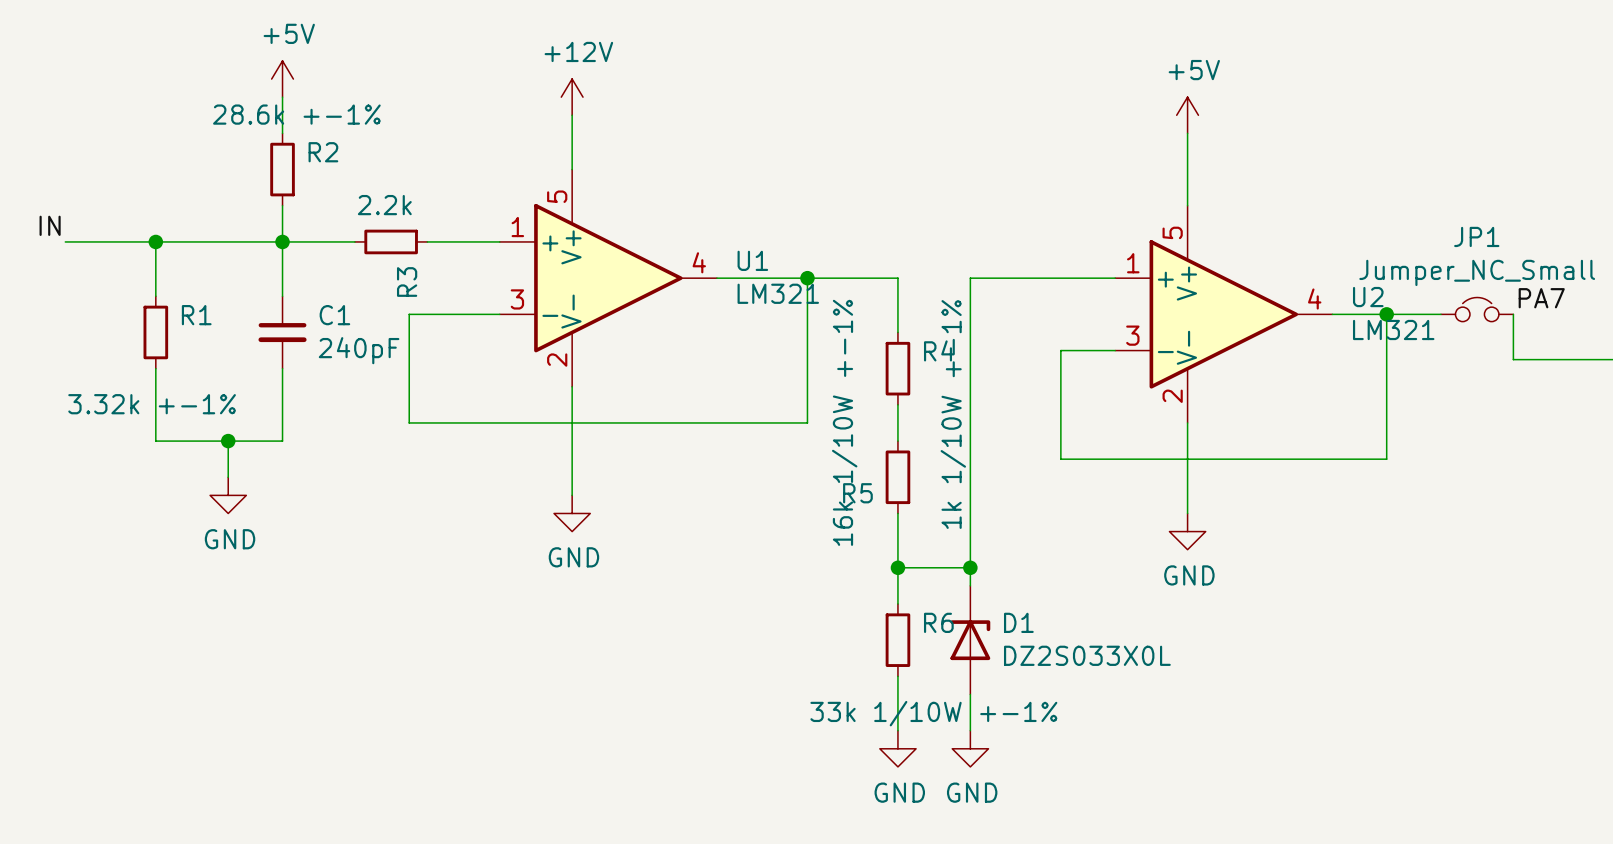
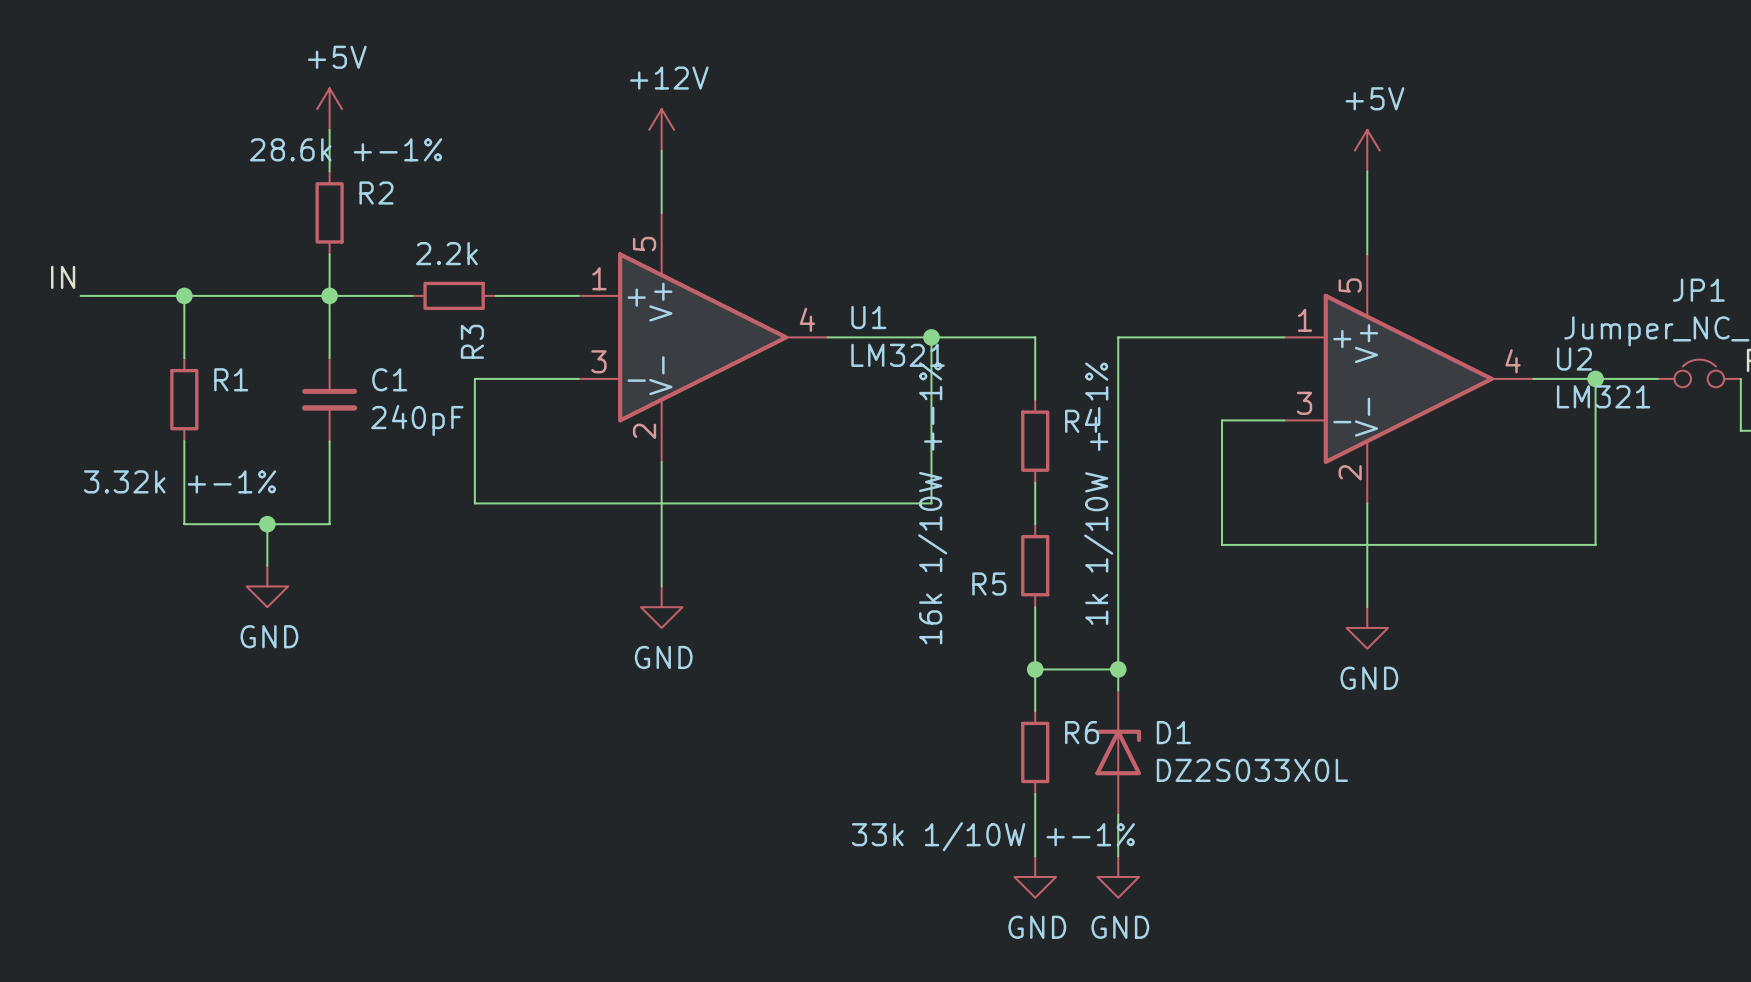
R4 value position: 16k 1/10W +-1% (844, 422) -> 16k 1/10W +-1% (932, 503)
R6 value position: 33k 1/10W +-1% (933, 713) -> 33k 1/10W +-1% (993, 836)

